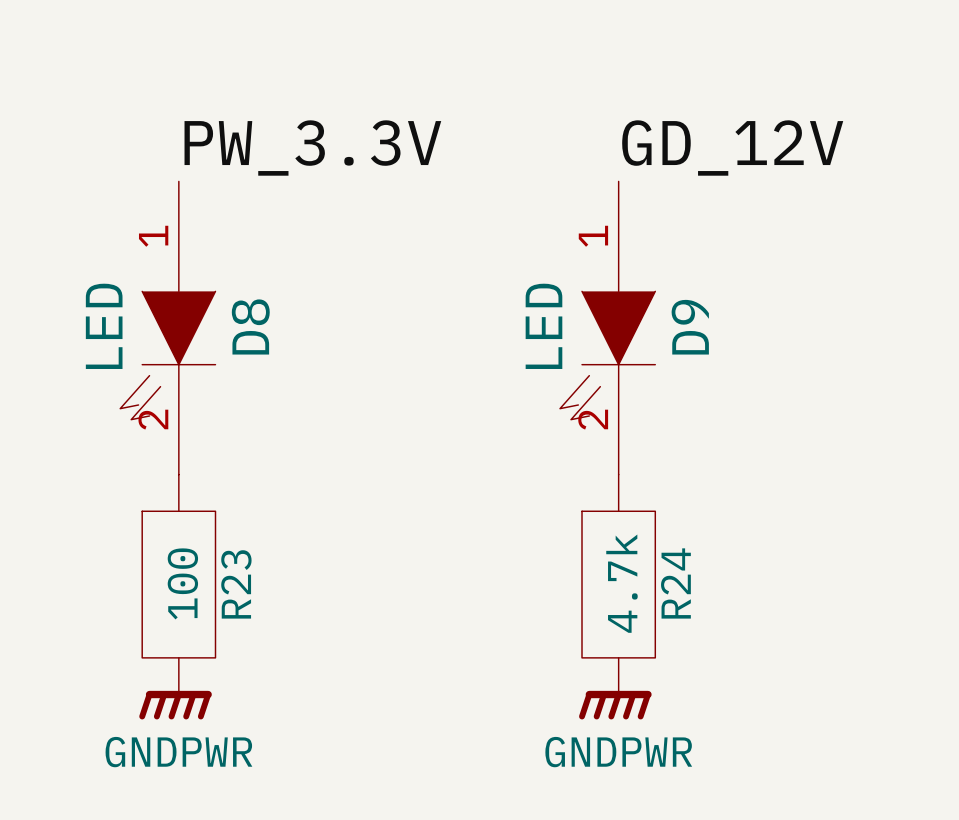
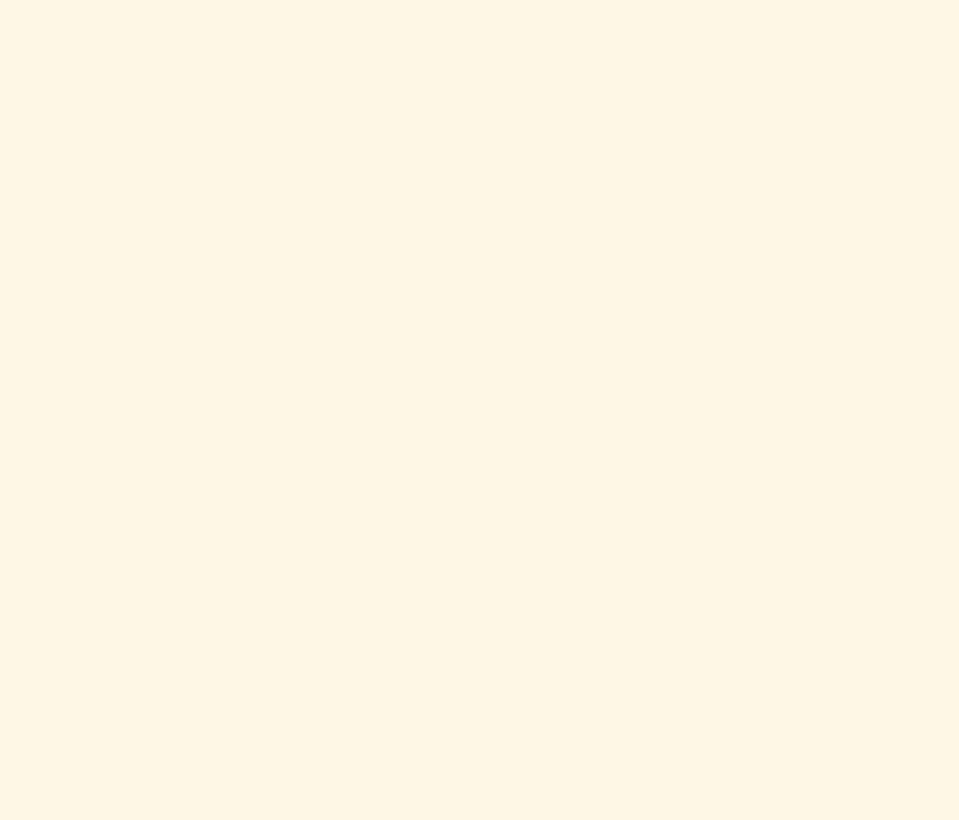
label: PW_3.3V (312, 148) -> none
label: GD_12V (732, 148) -> none
D8: LED (167, 328) -> none
D9: LED (607, 328) -> none
R23: 100 (178, 584) -> none
R24: 4.7k (618, 584) -> none
power symbol: GNDPWR (175, 705) -> none
power symbol: GNDPWR (615, 705) -> none

